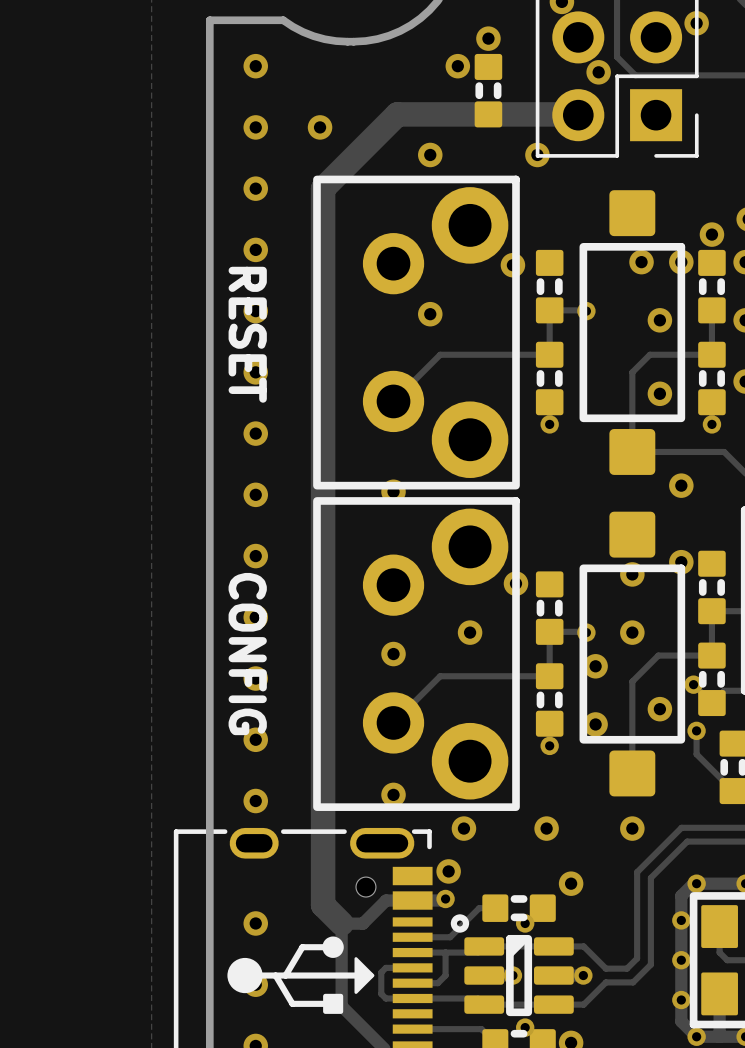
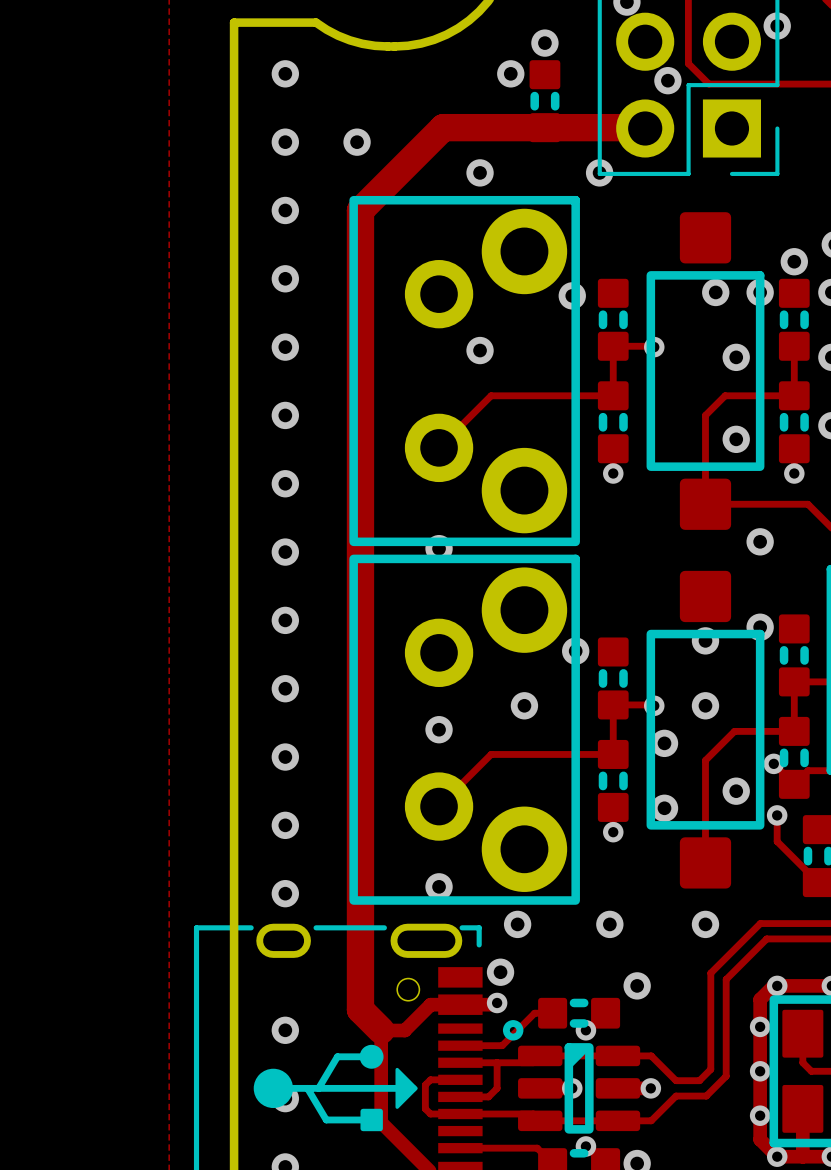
text: RESET (247, 334) -> none
text: CONFIG (247, 654) -> none

